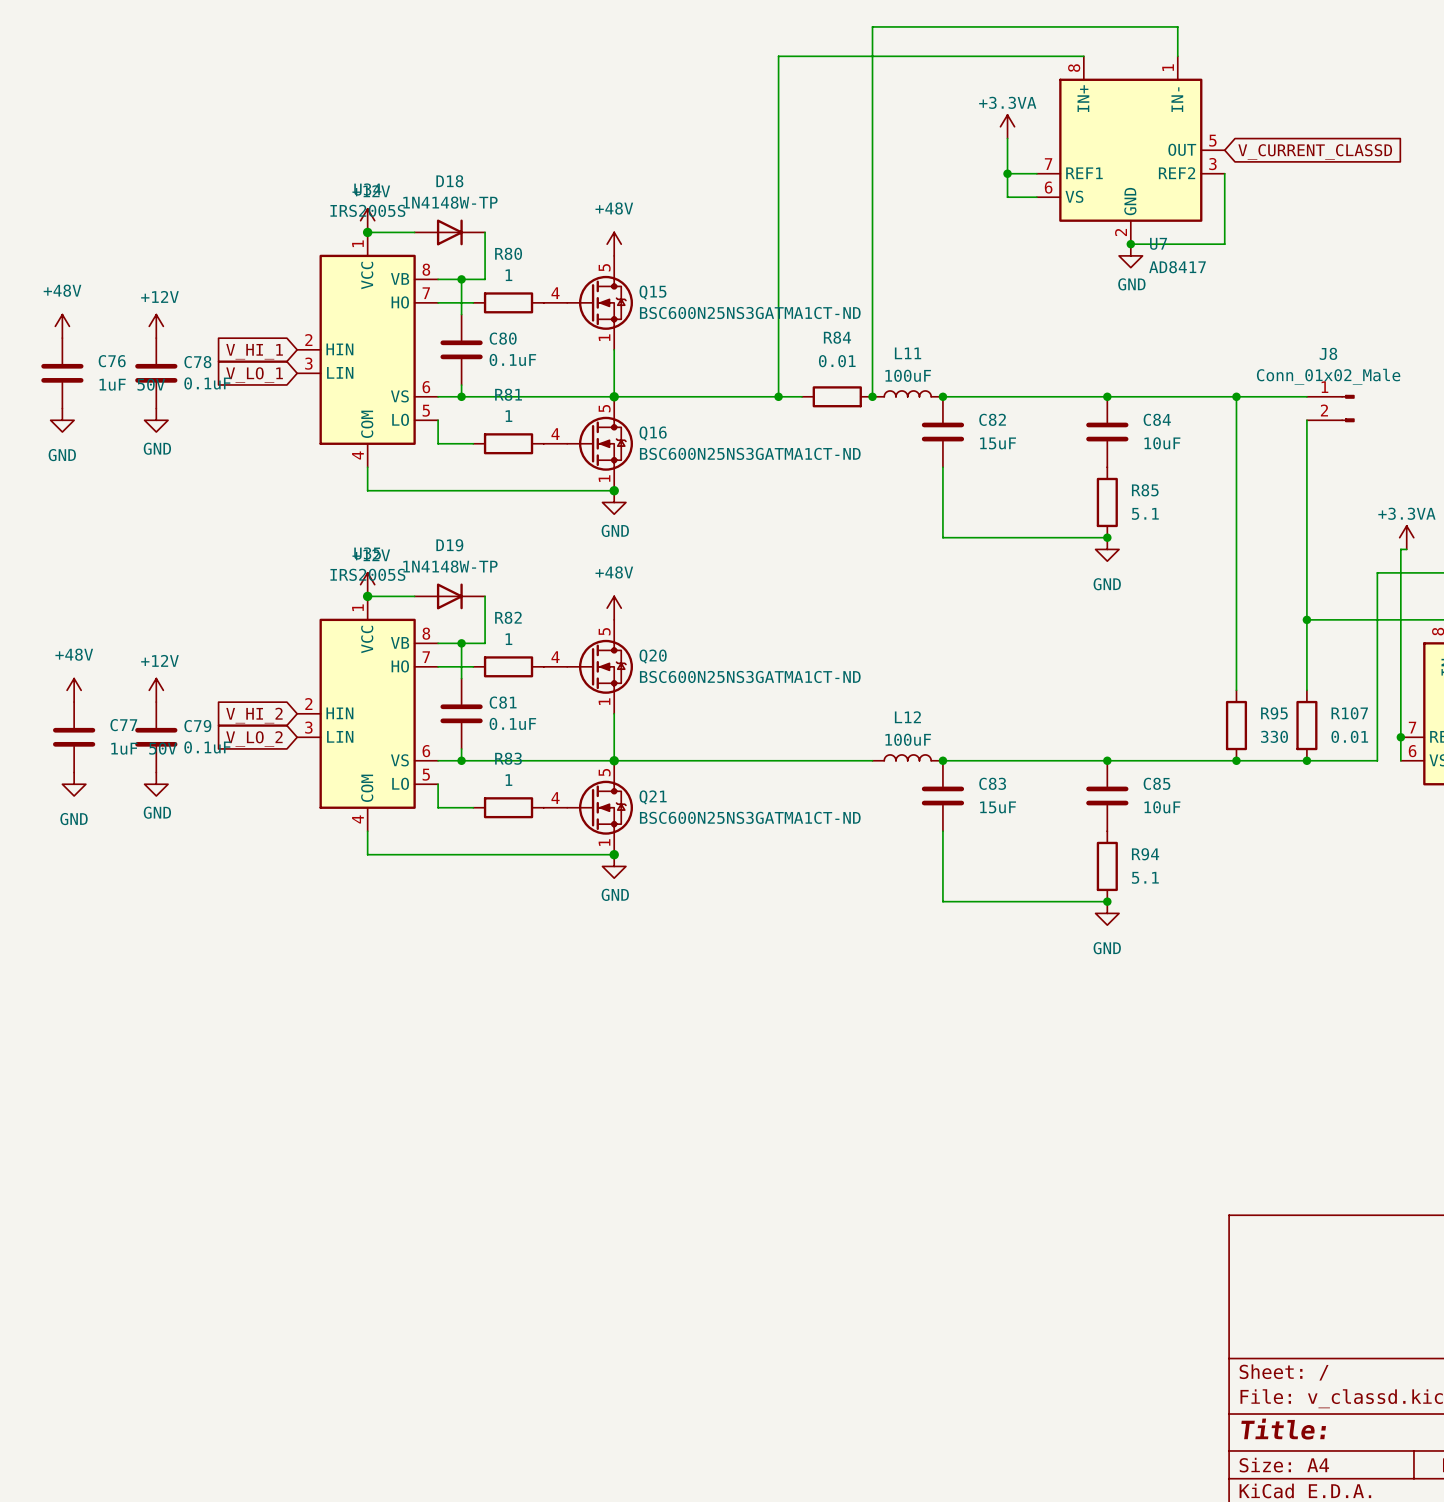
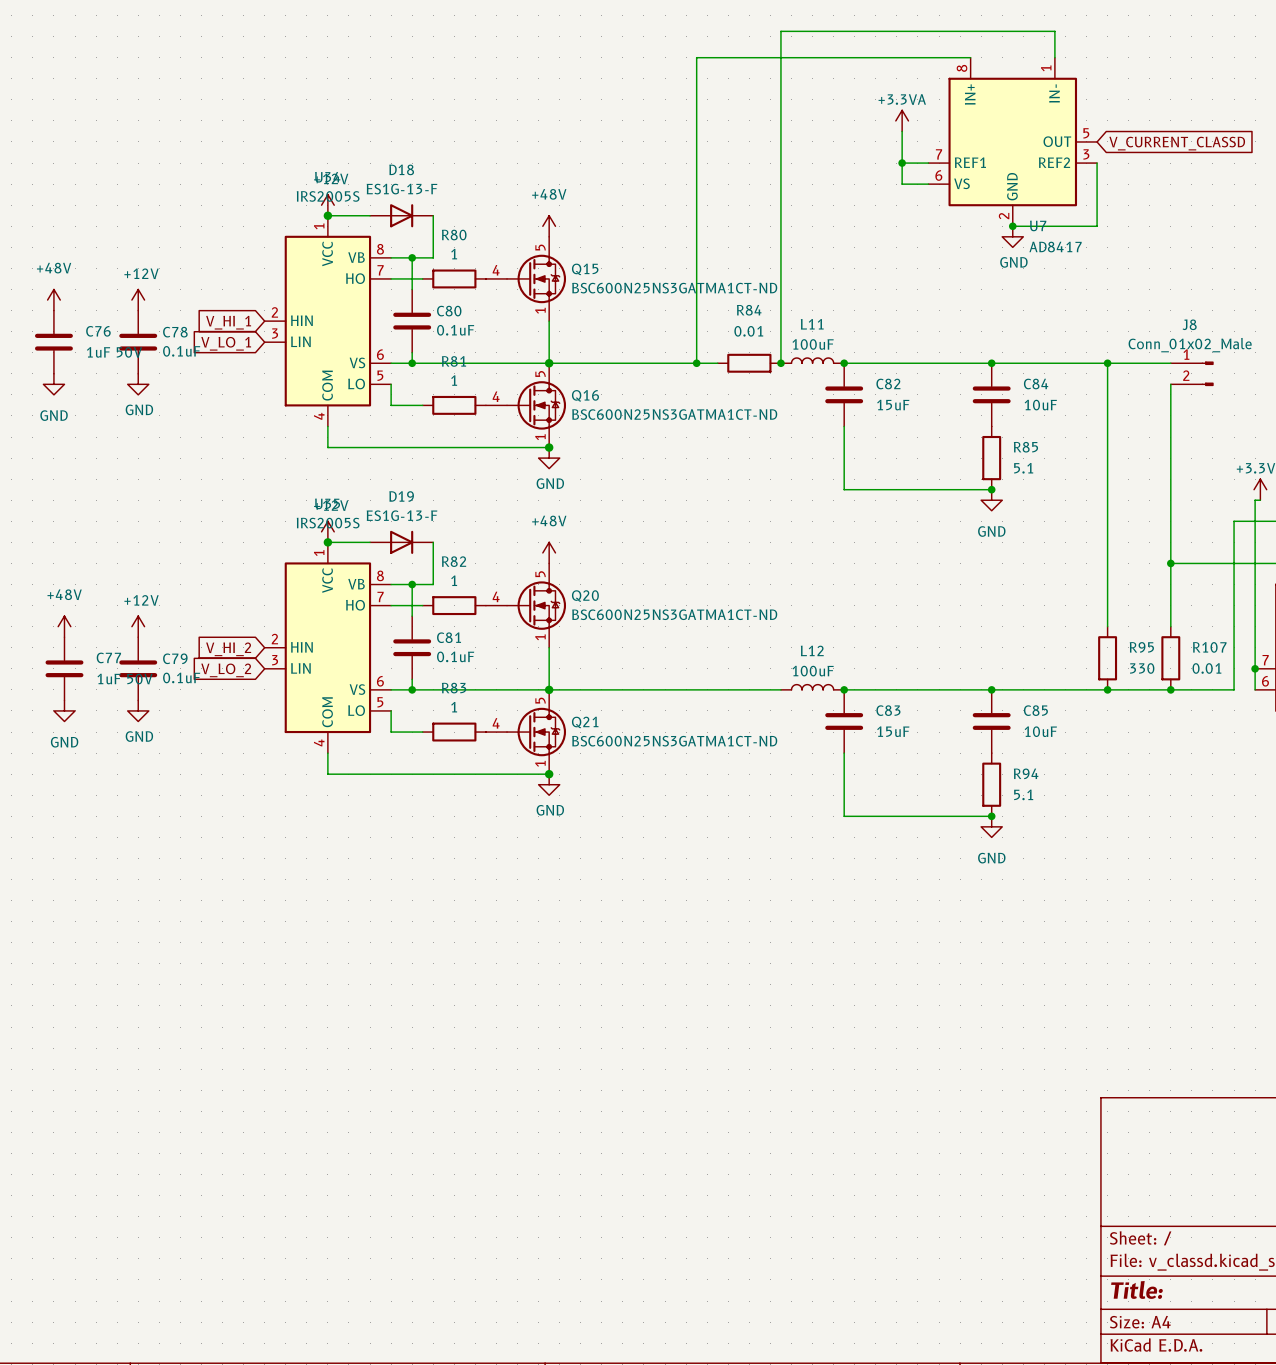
D18 value: 1N4148W-TP (450, 202) -> ES1G-13-F (402, 189)
D19 value: 1N4148W-TP (450, 566) -> ES1G-13-F (402, 515)

